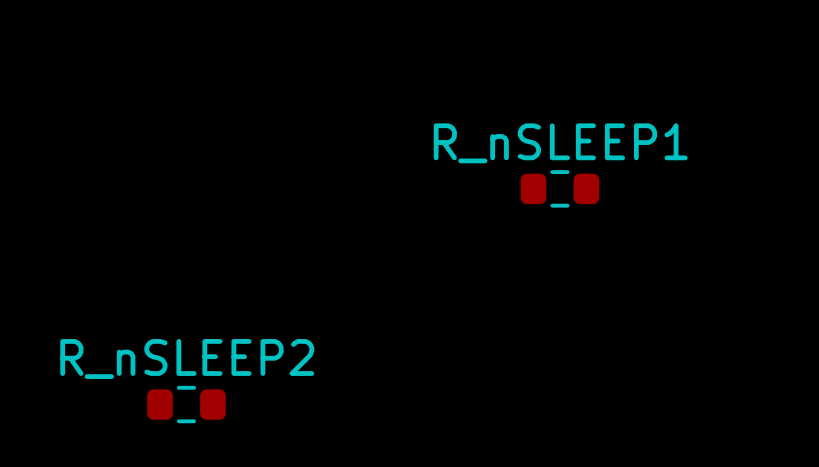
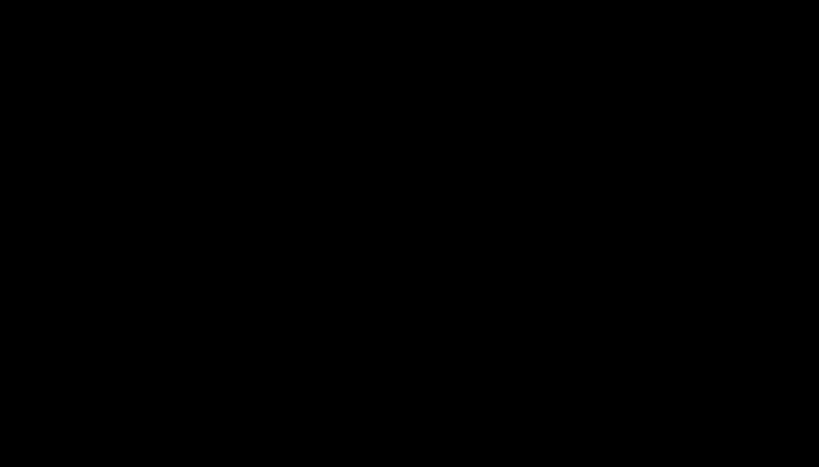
R_nSLEEP1: (559, 188) -> none
R_nSLEEP2: (186, 404) -> none

